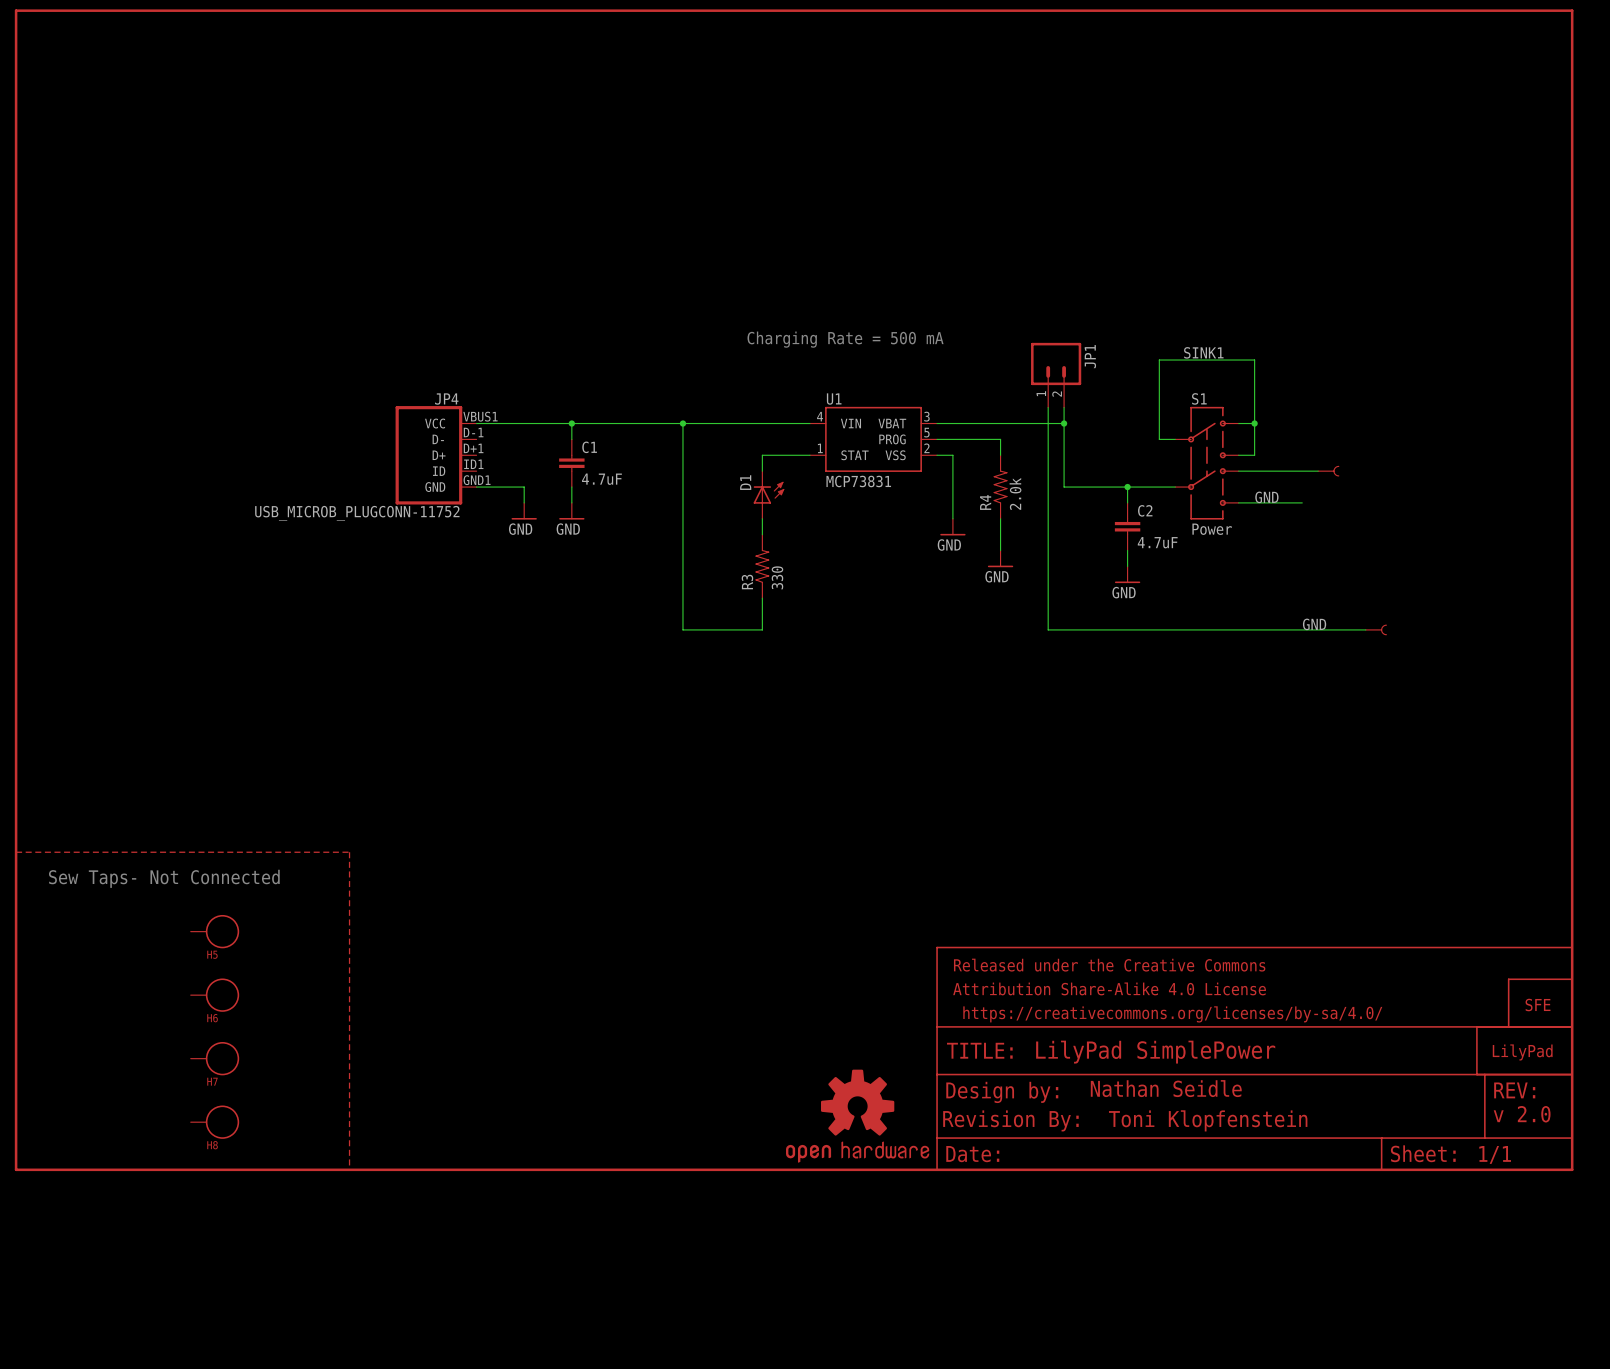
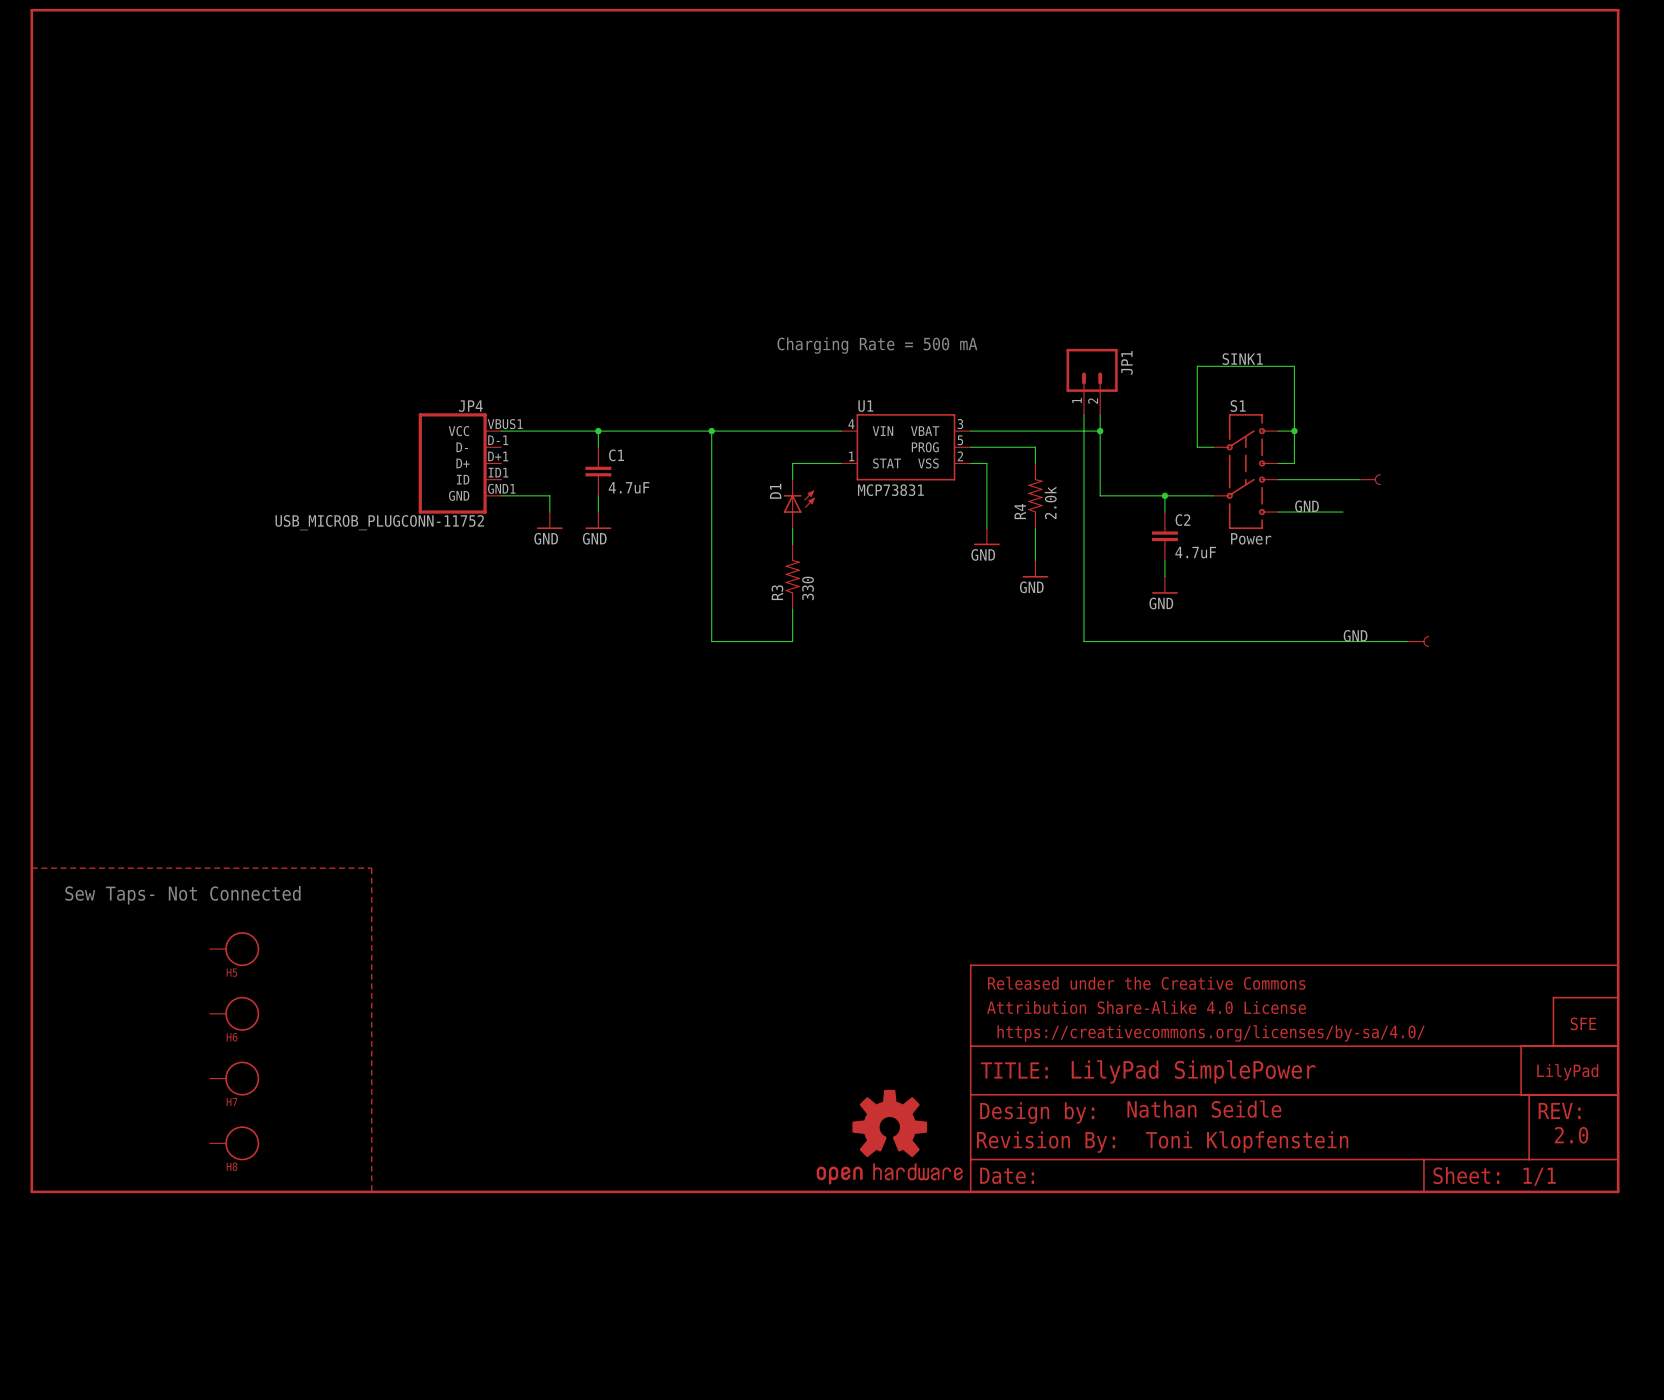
text: v 2.0 (1522, 1114) -> 2.0 (1571, 1135)

